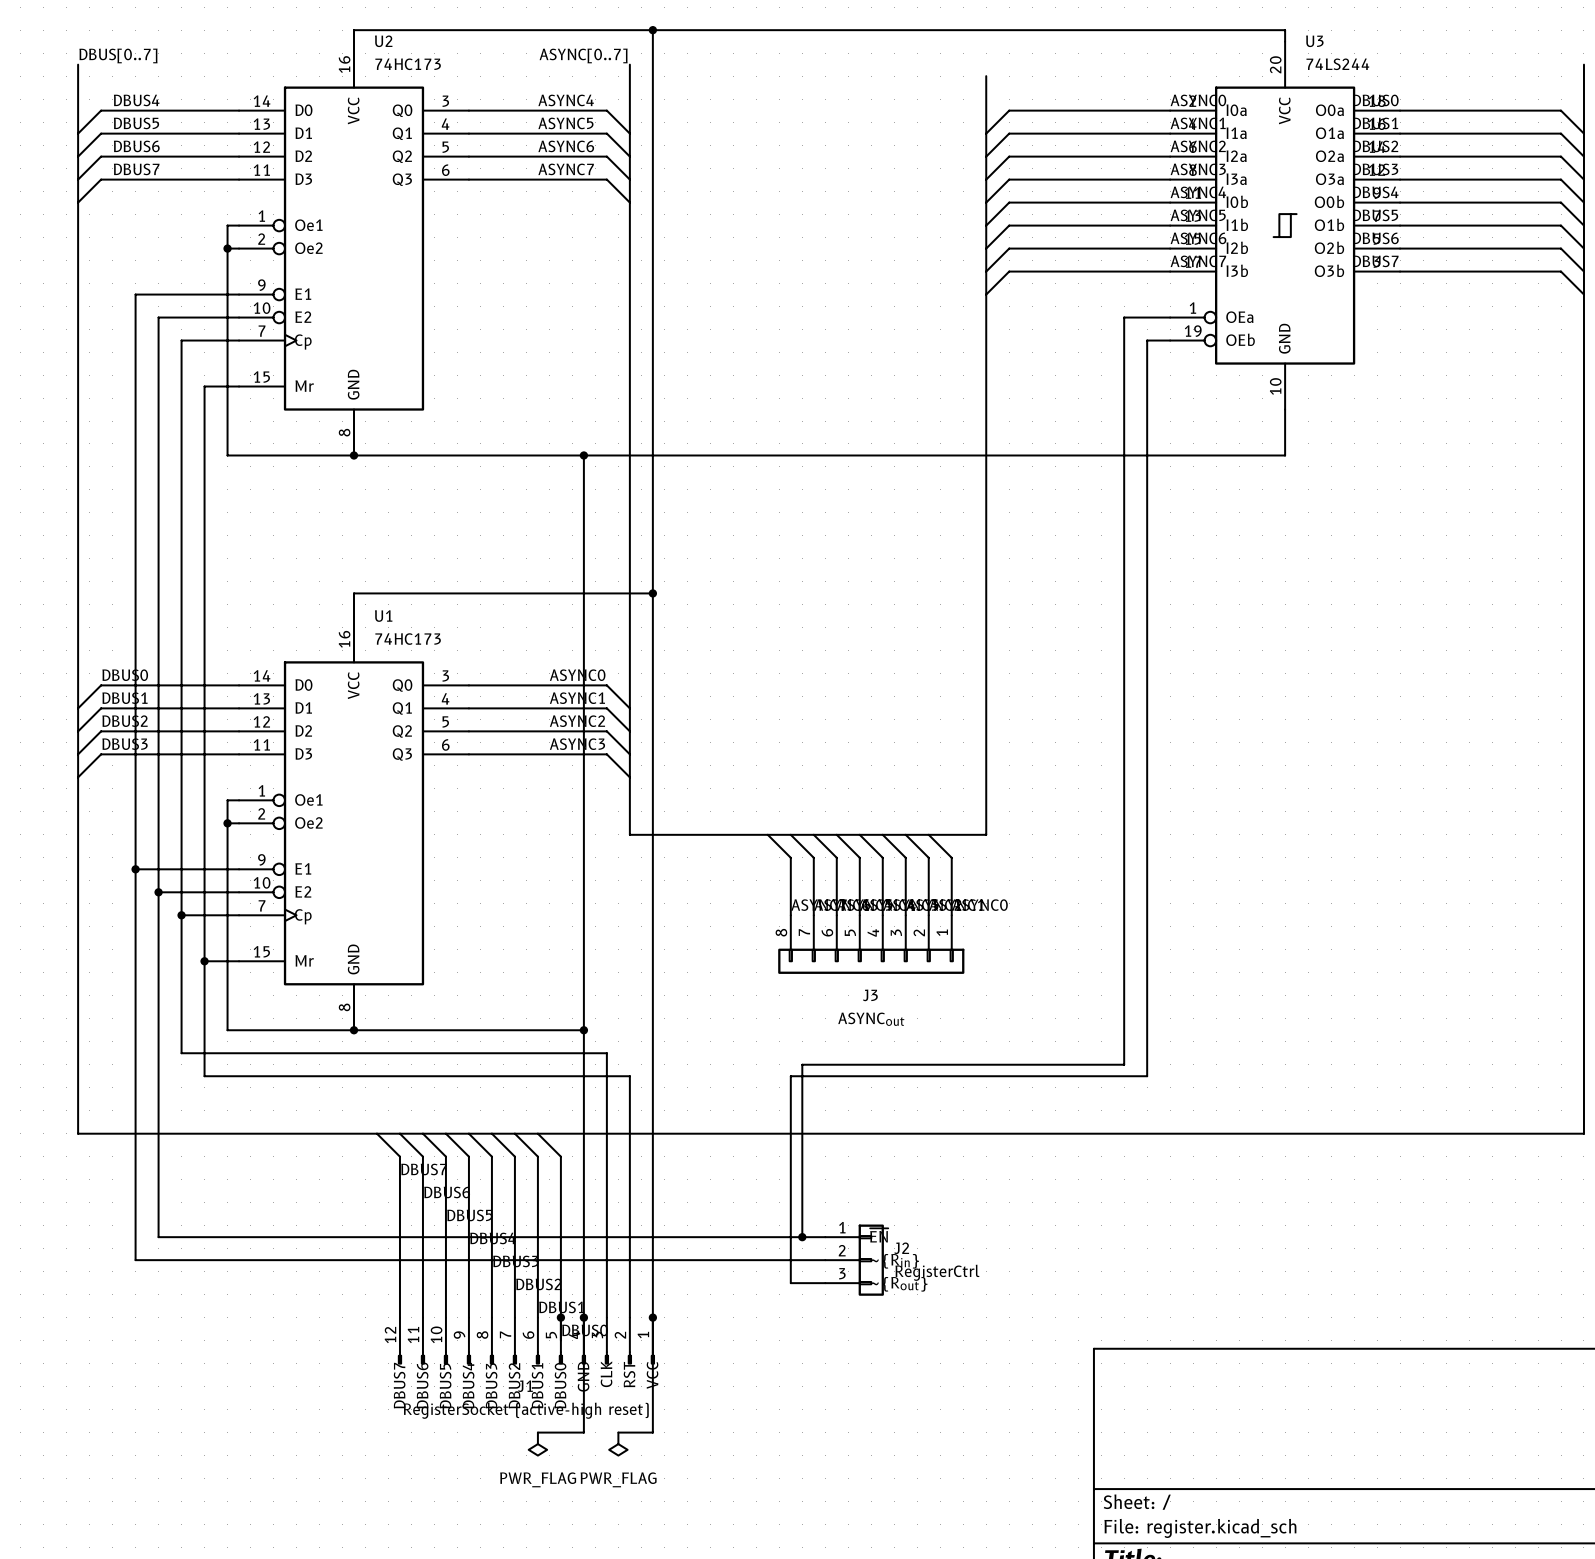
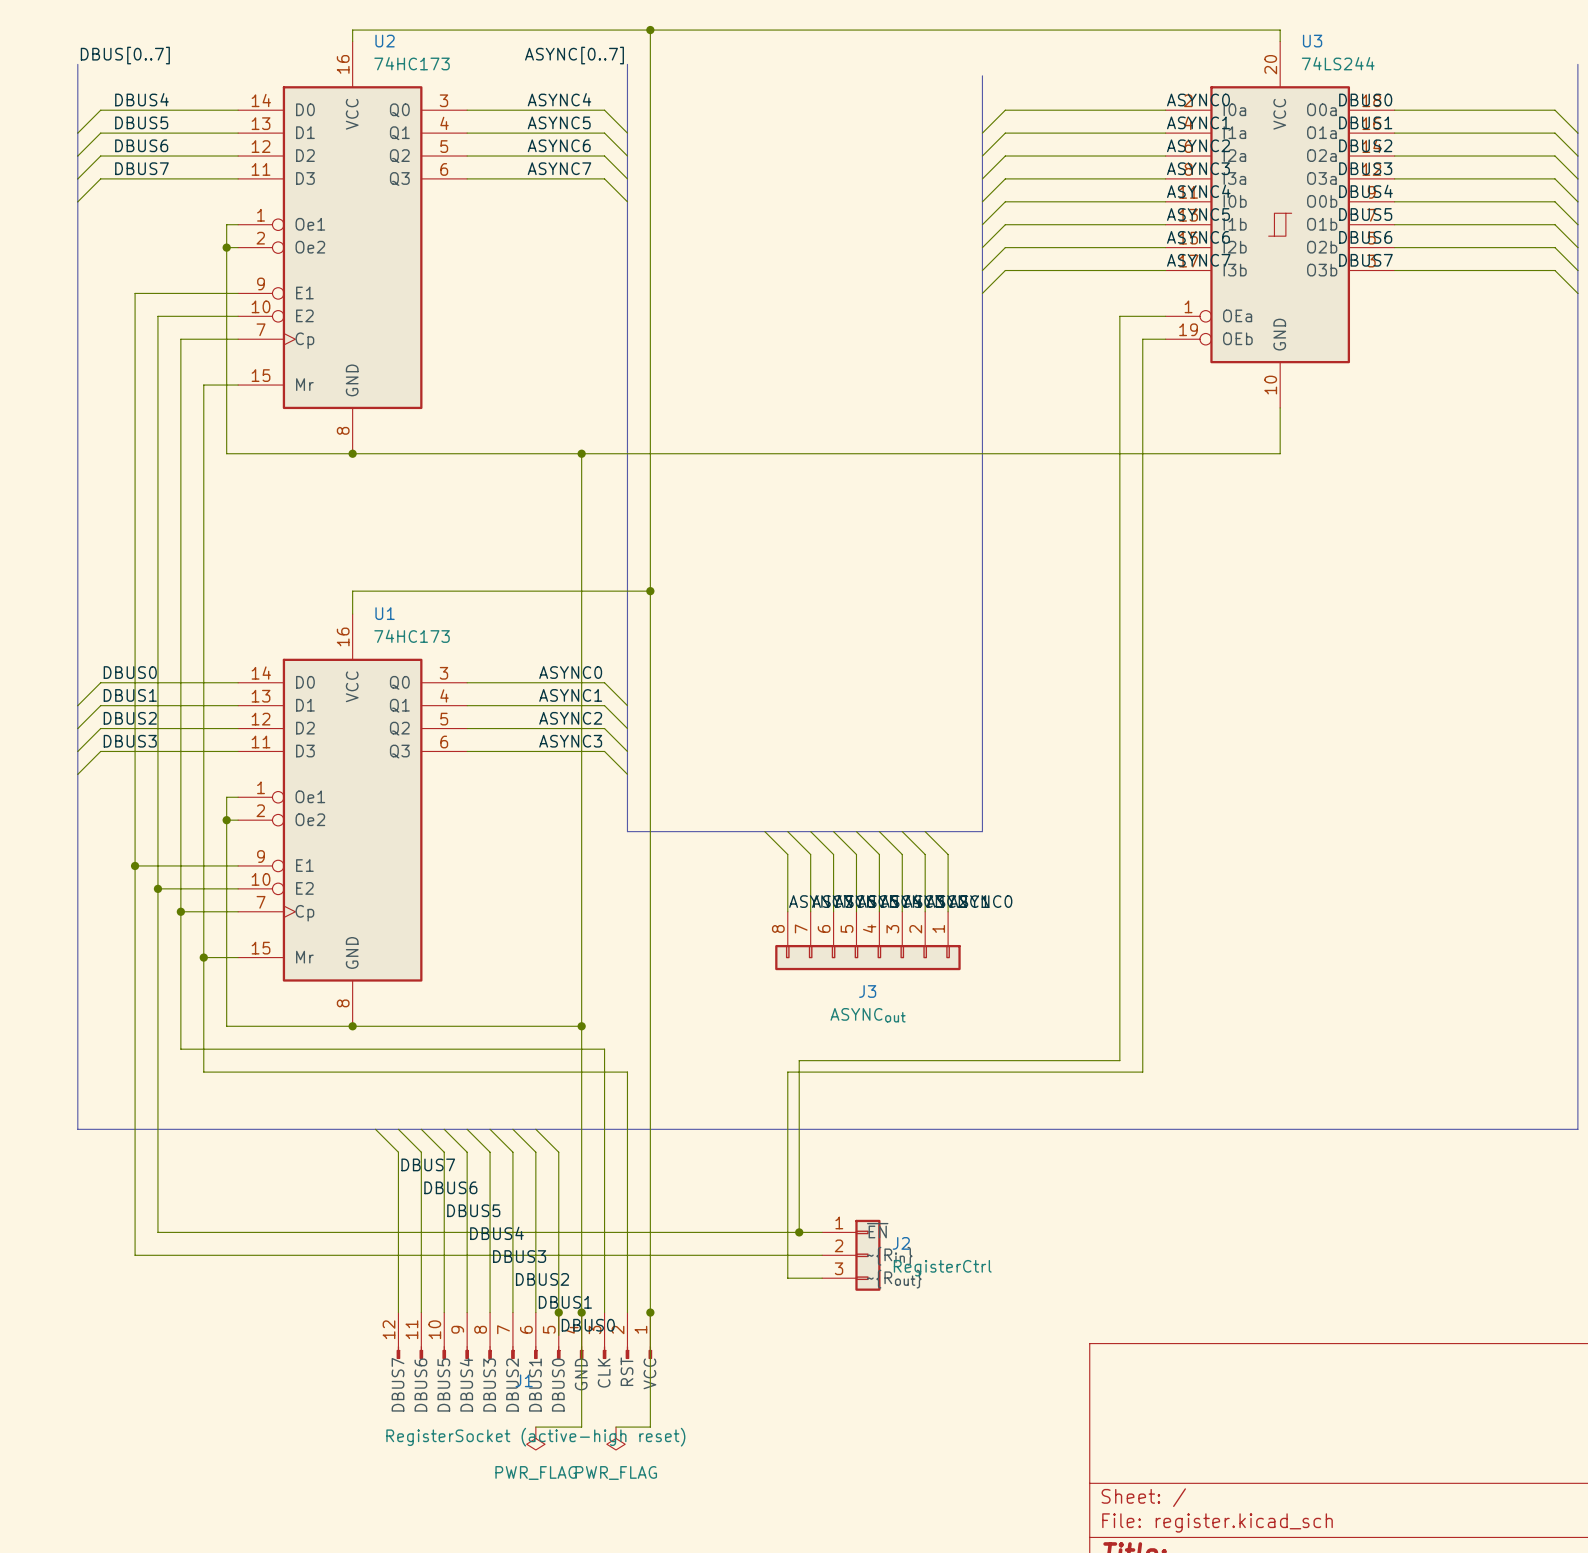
J1 value position: RegisterSocket (active-high reset) (526, 1410) -> RegisterSocket (active-high reset) (535, 1437)

